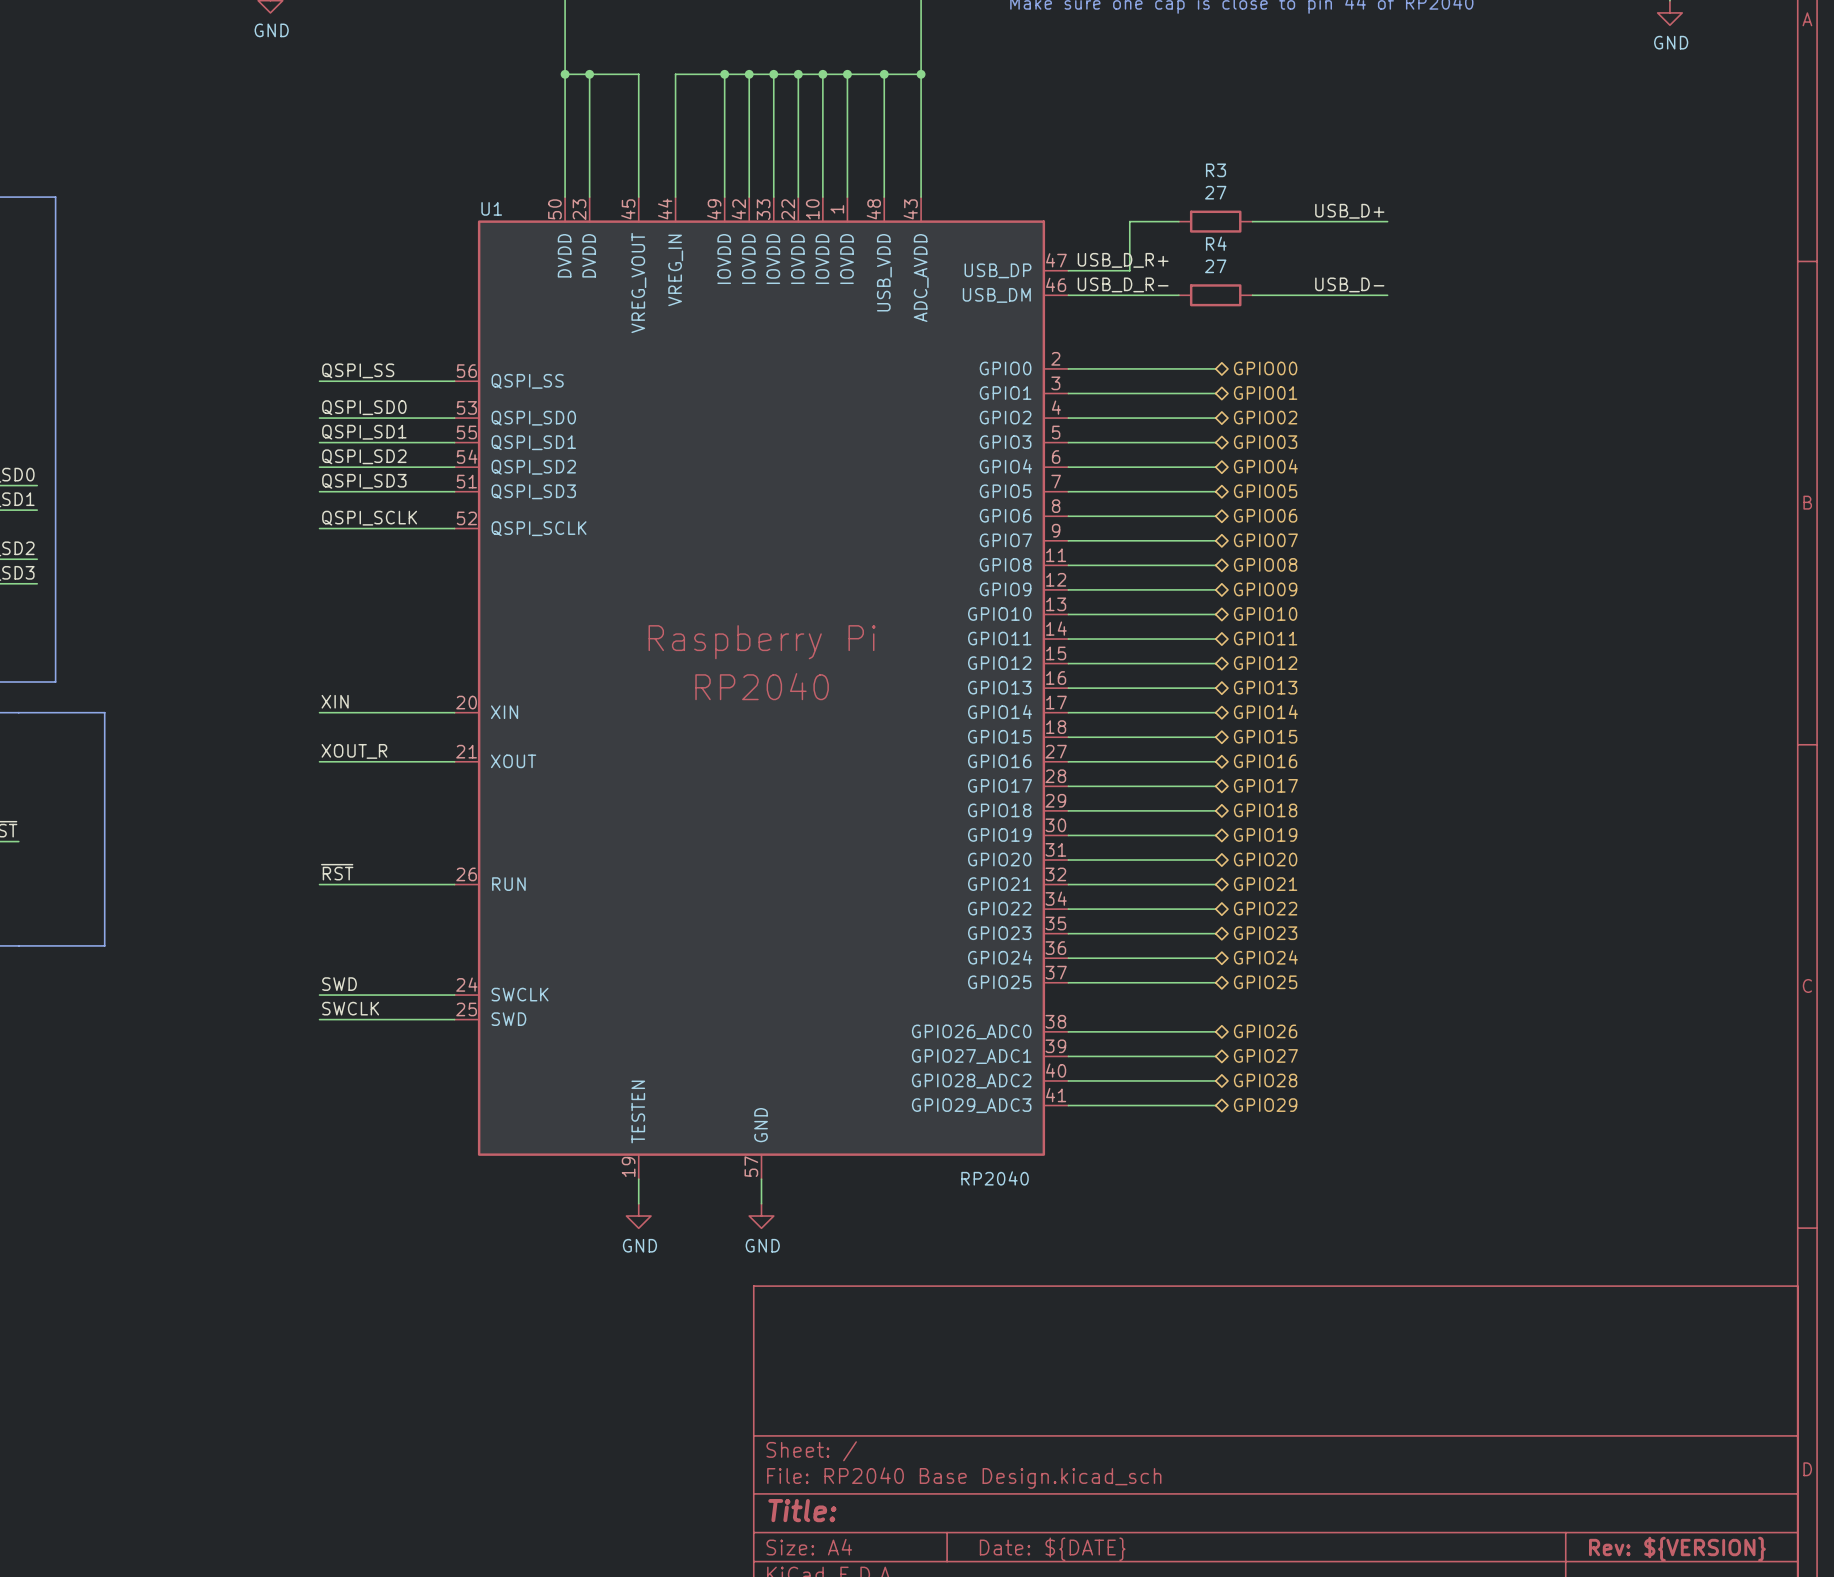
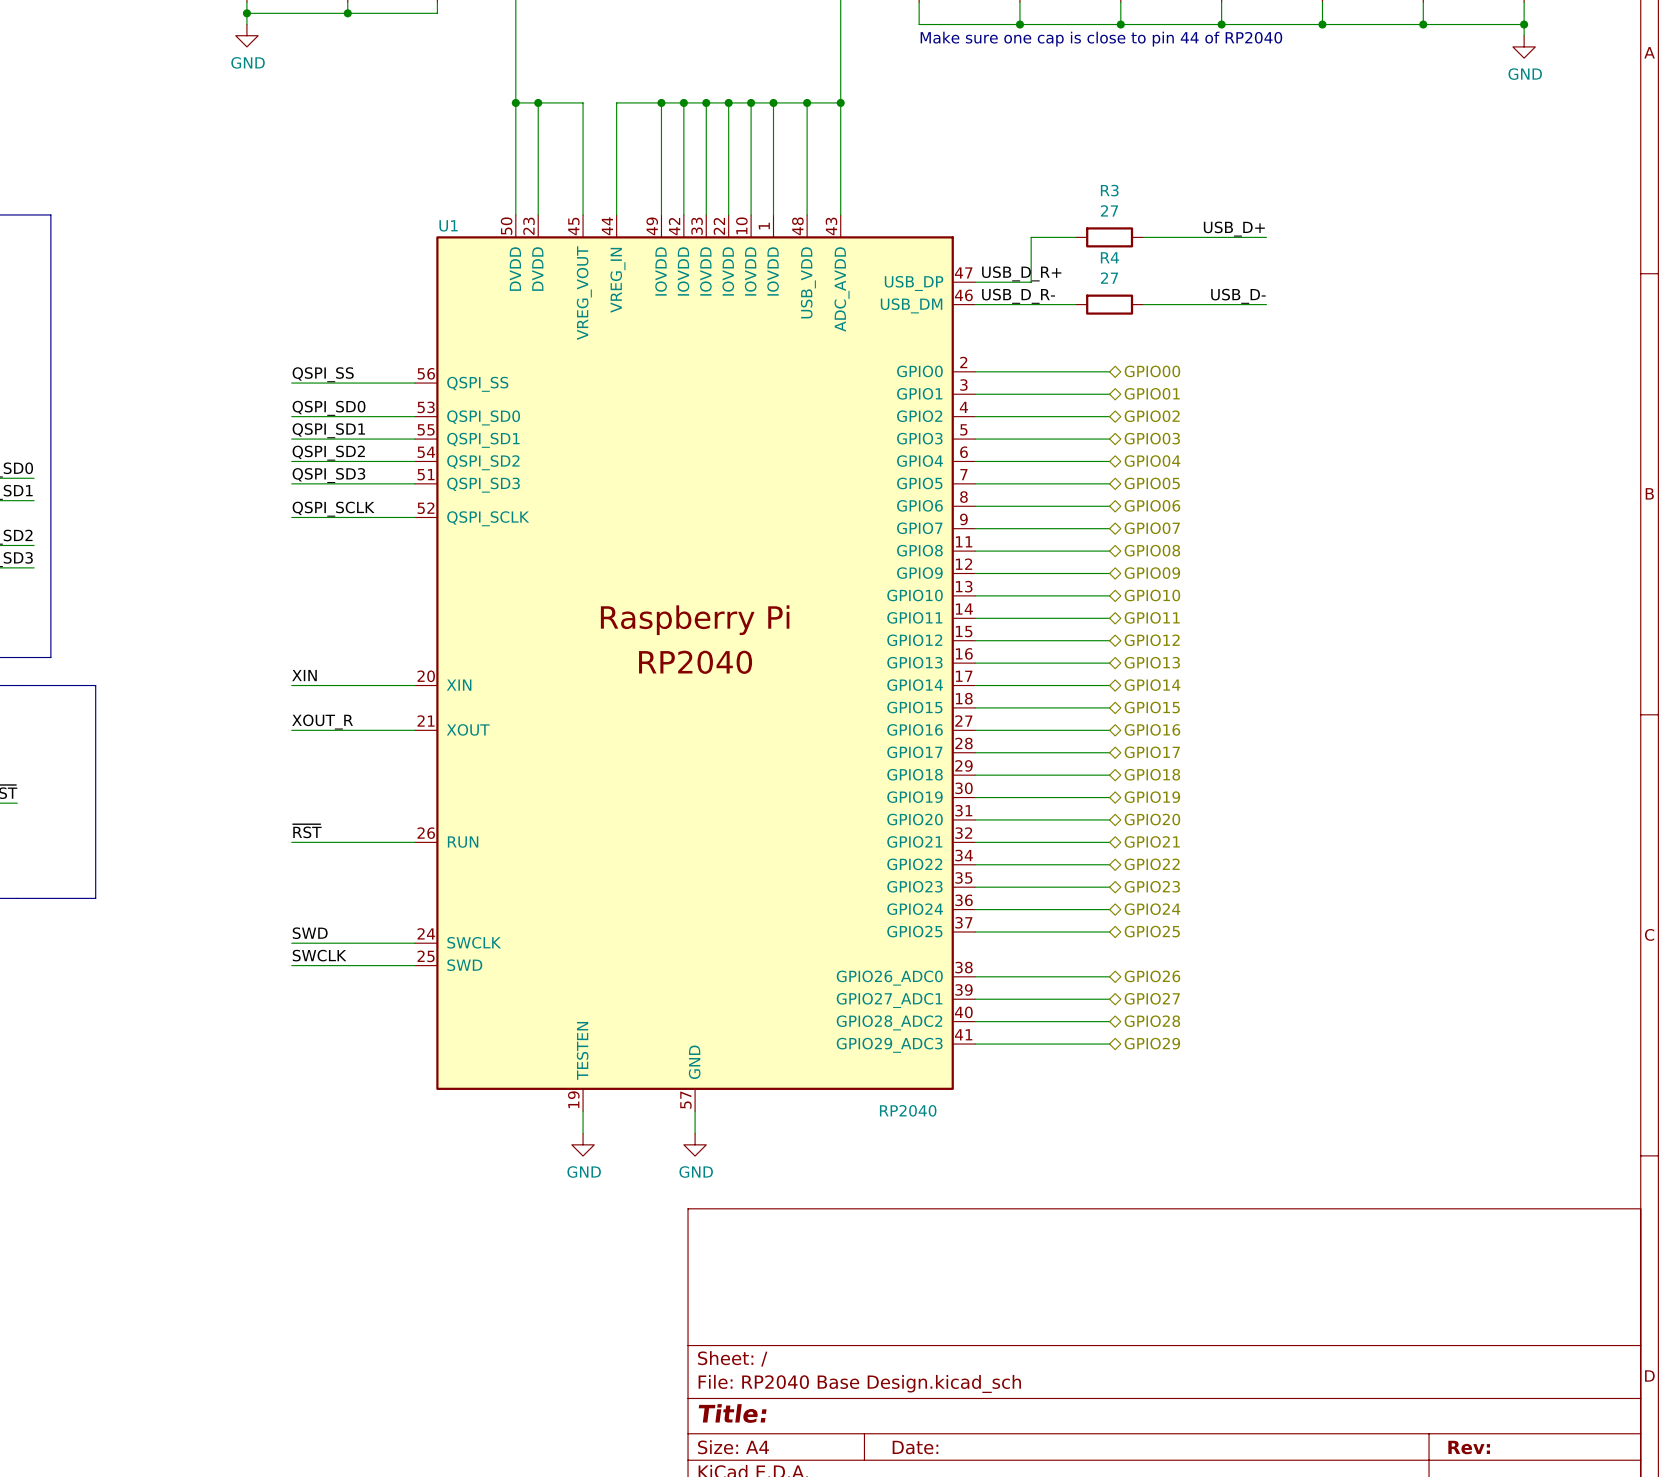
title block: Date: ${DATE} (1052, 1549) -> Date: (915, 1447)
title block: Rev: ${VERSION} (1677, 1549) -> Rev: (1469, 1447)

